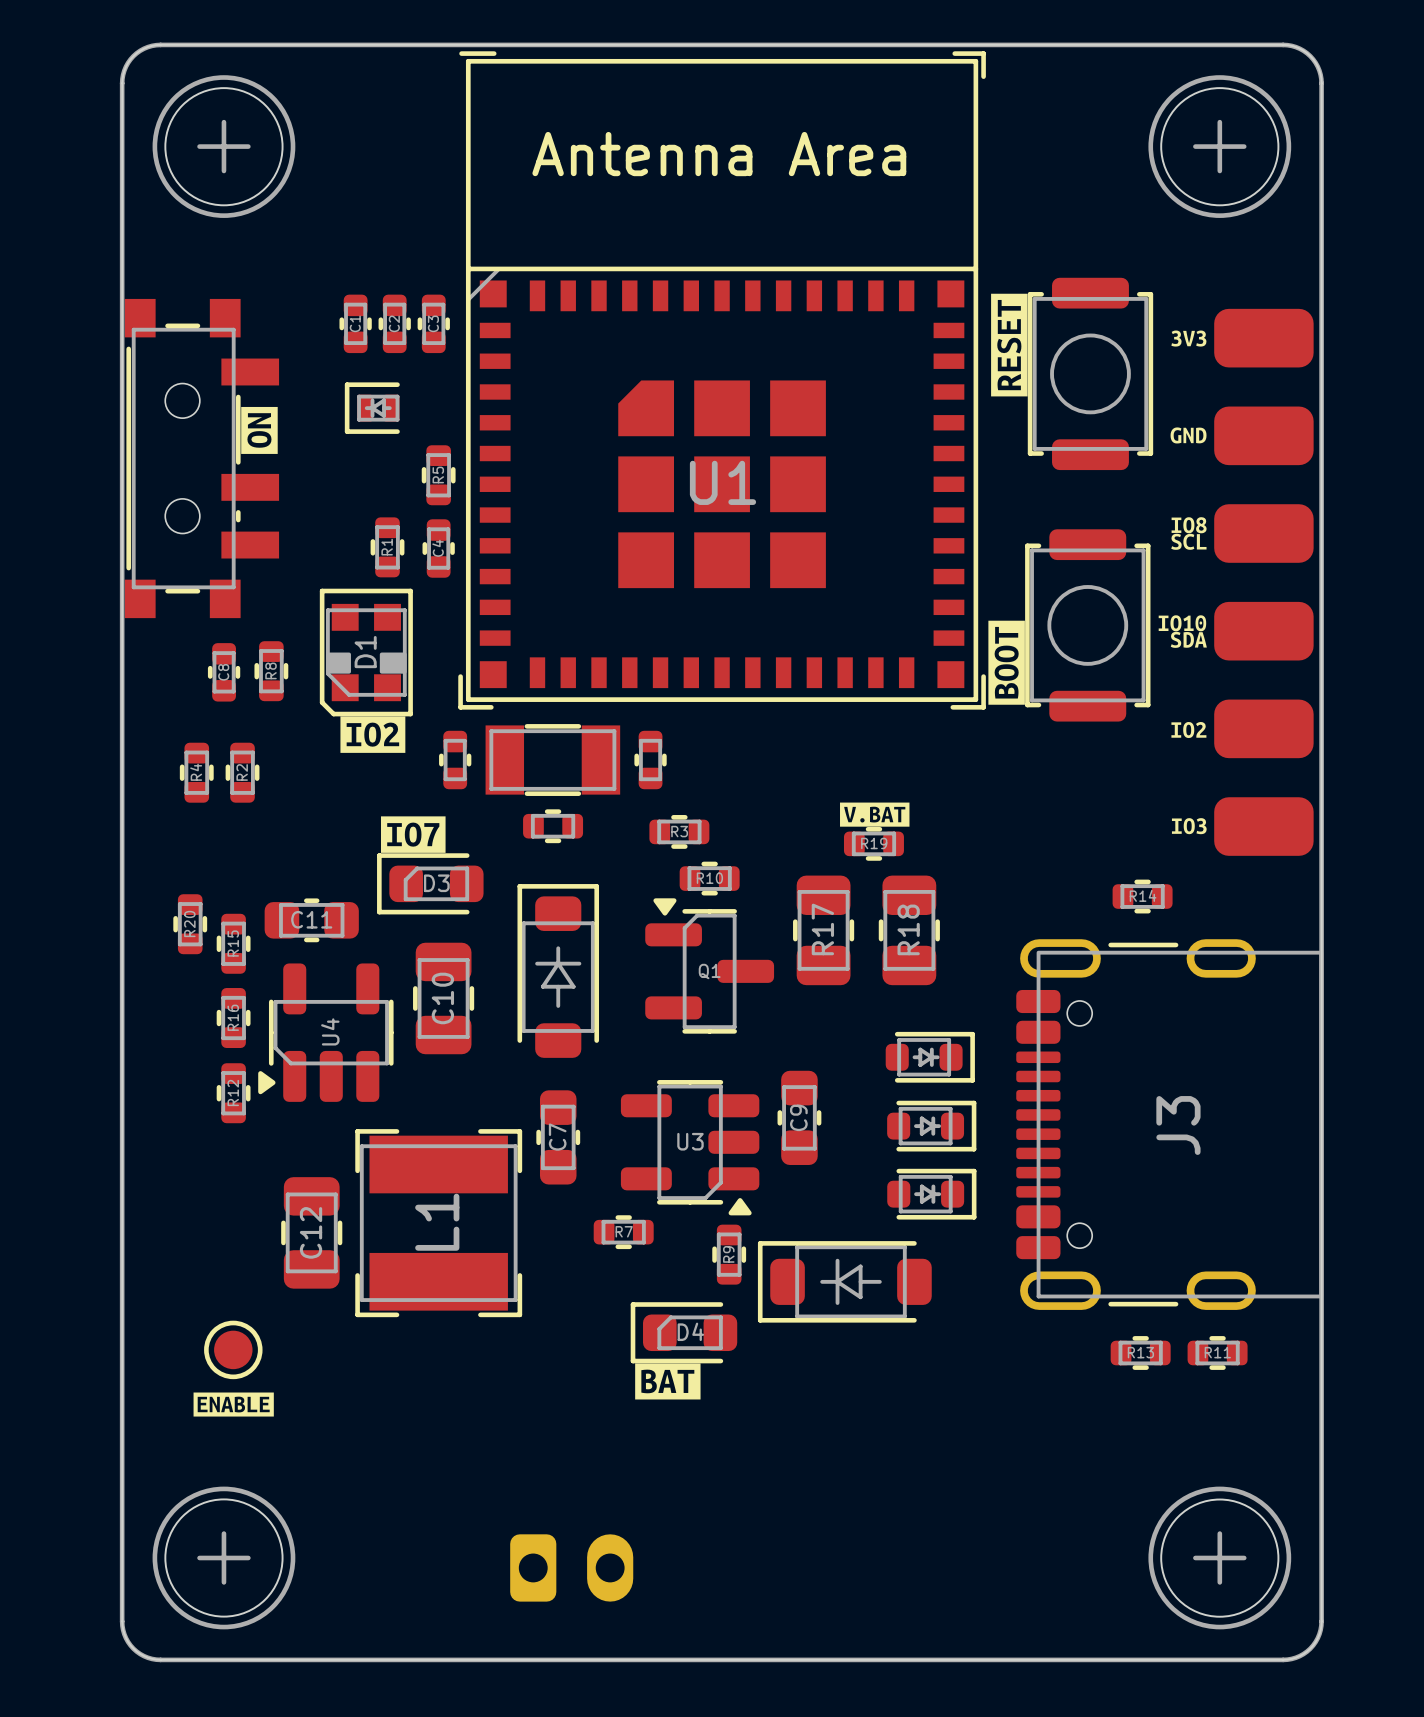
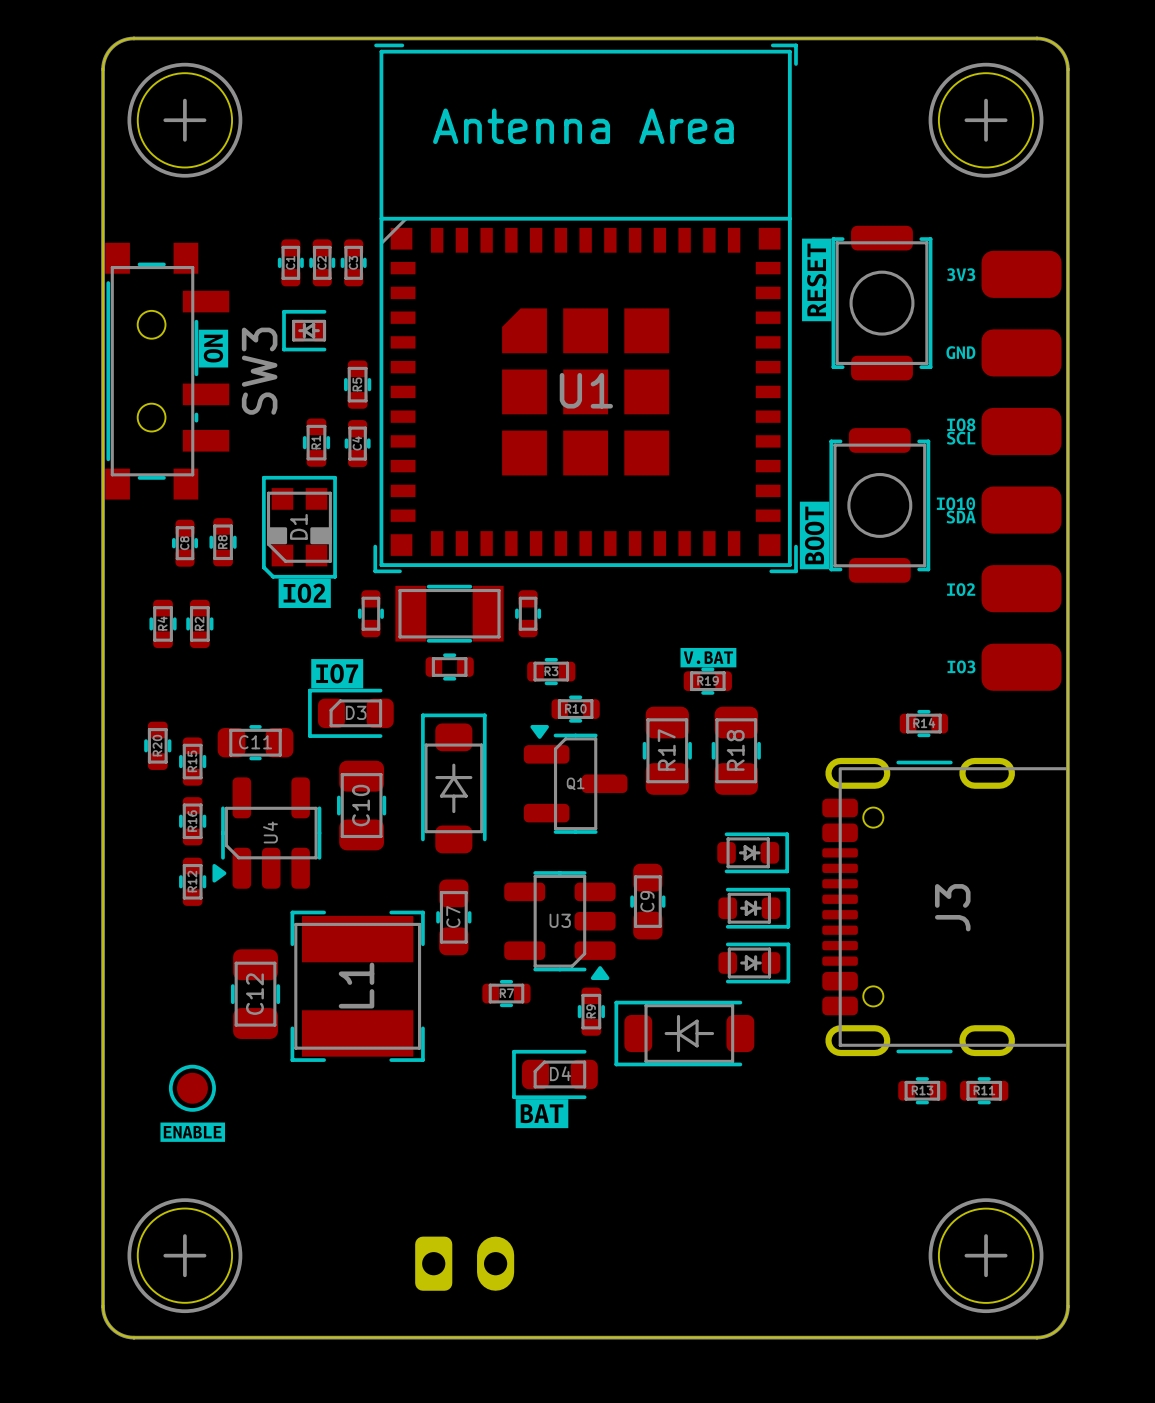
SW3 name: none -> SW3 (259, 371)

